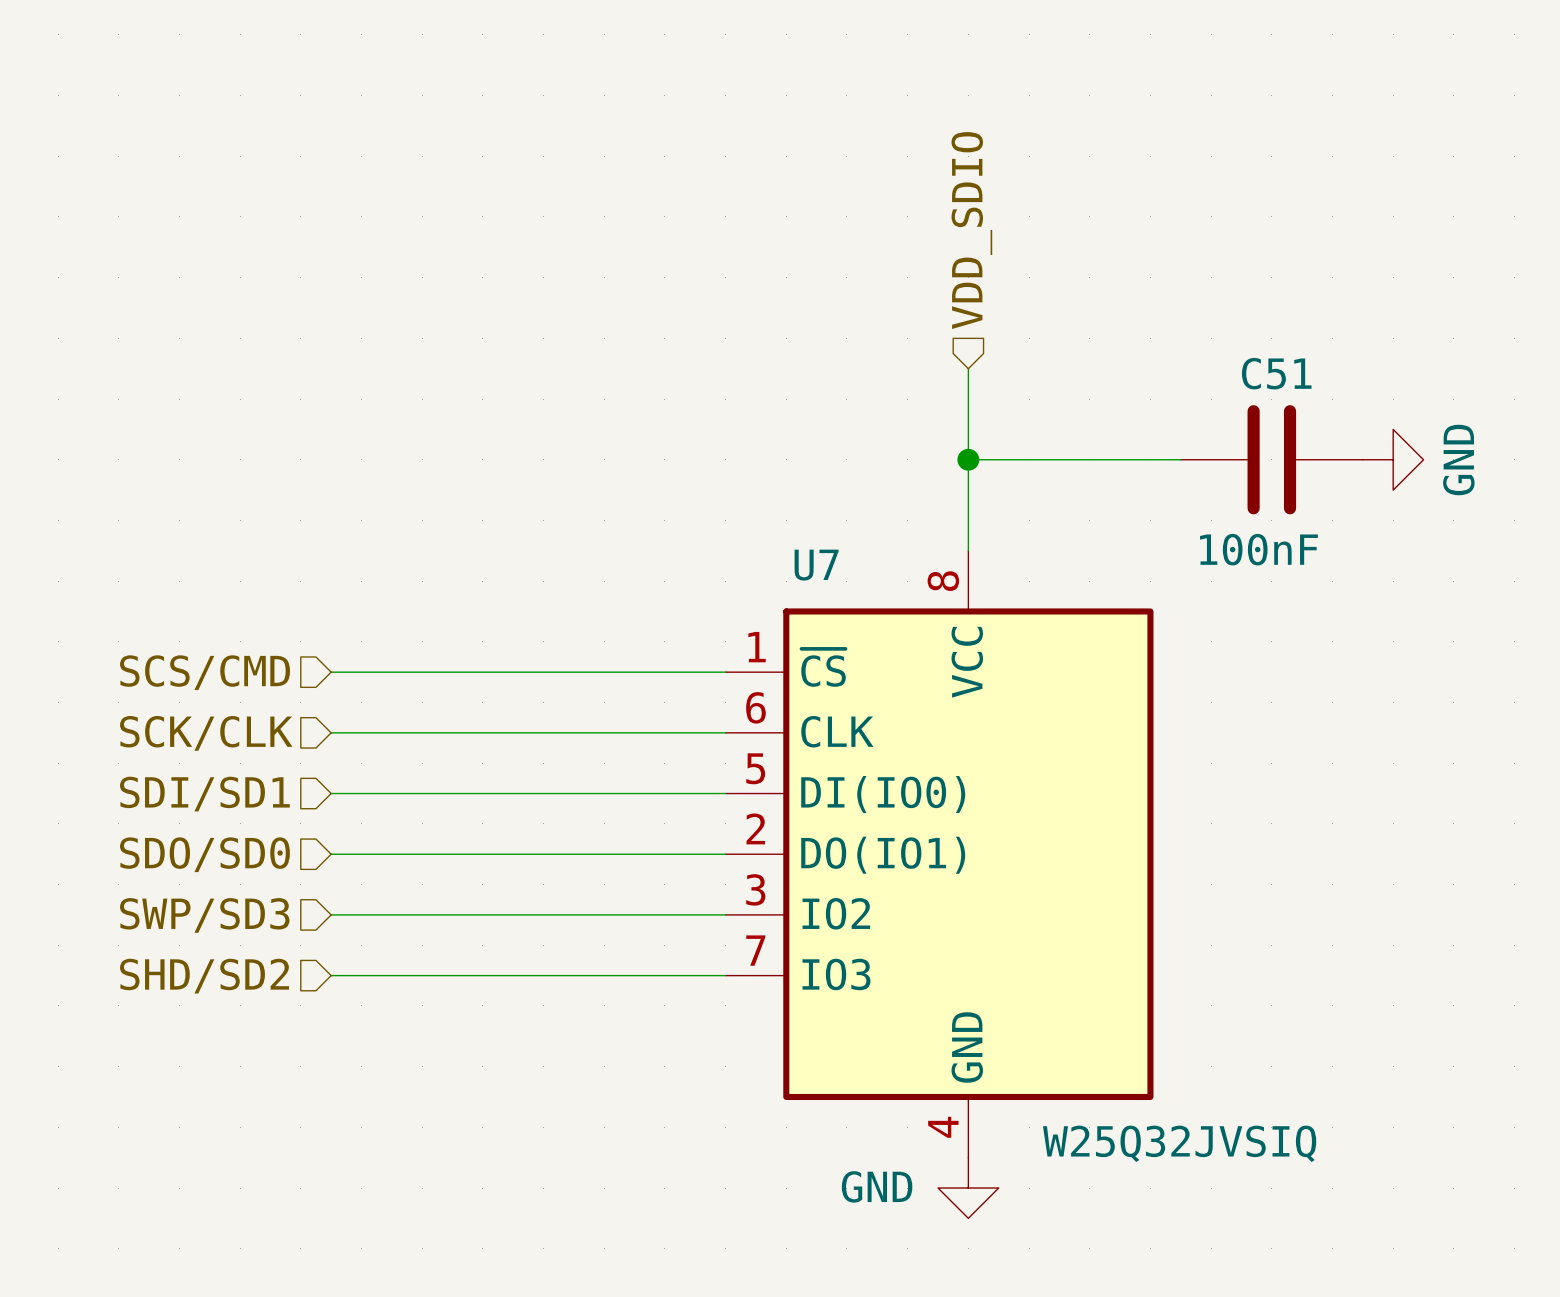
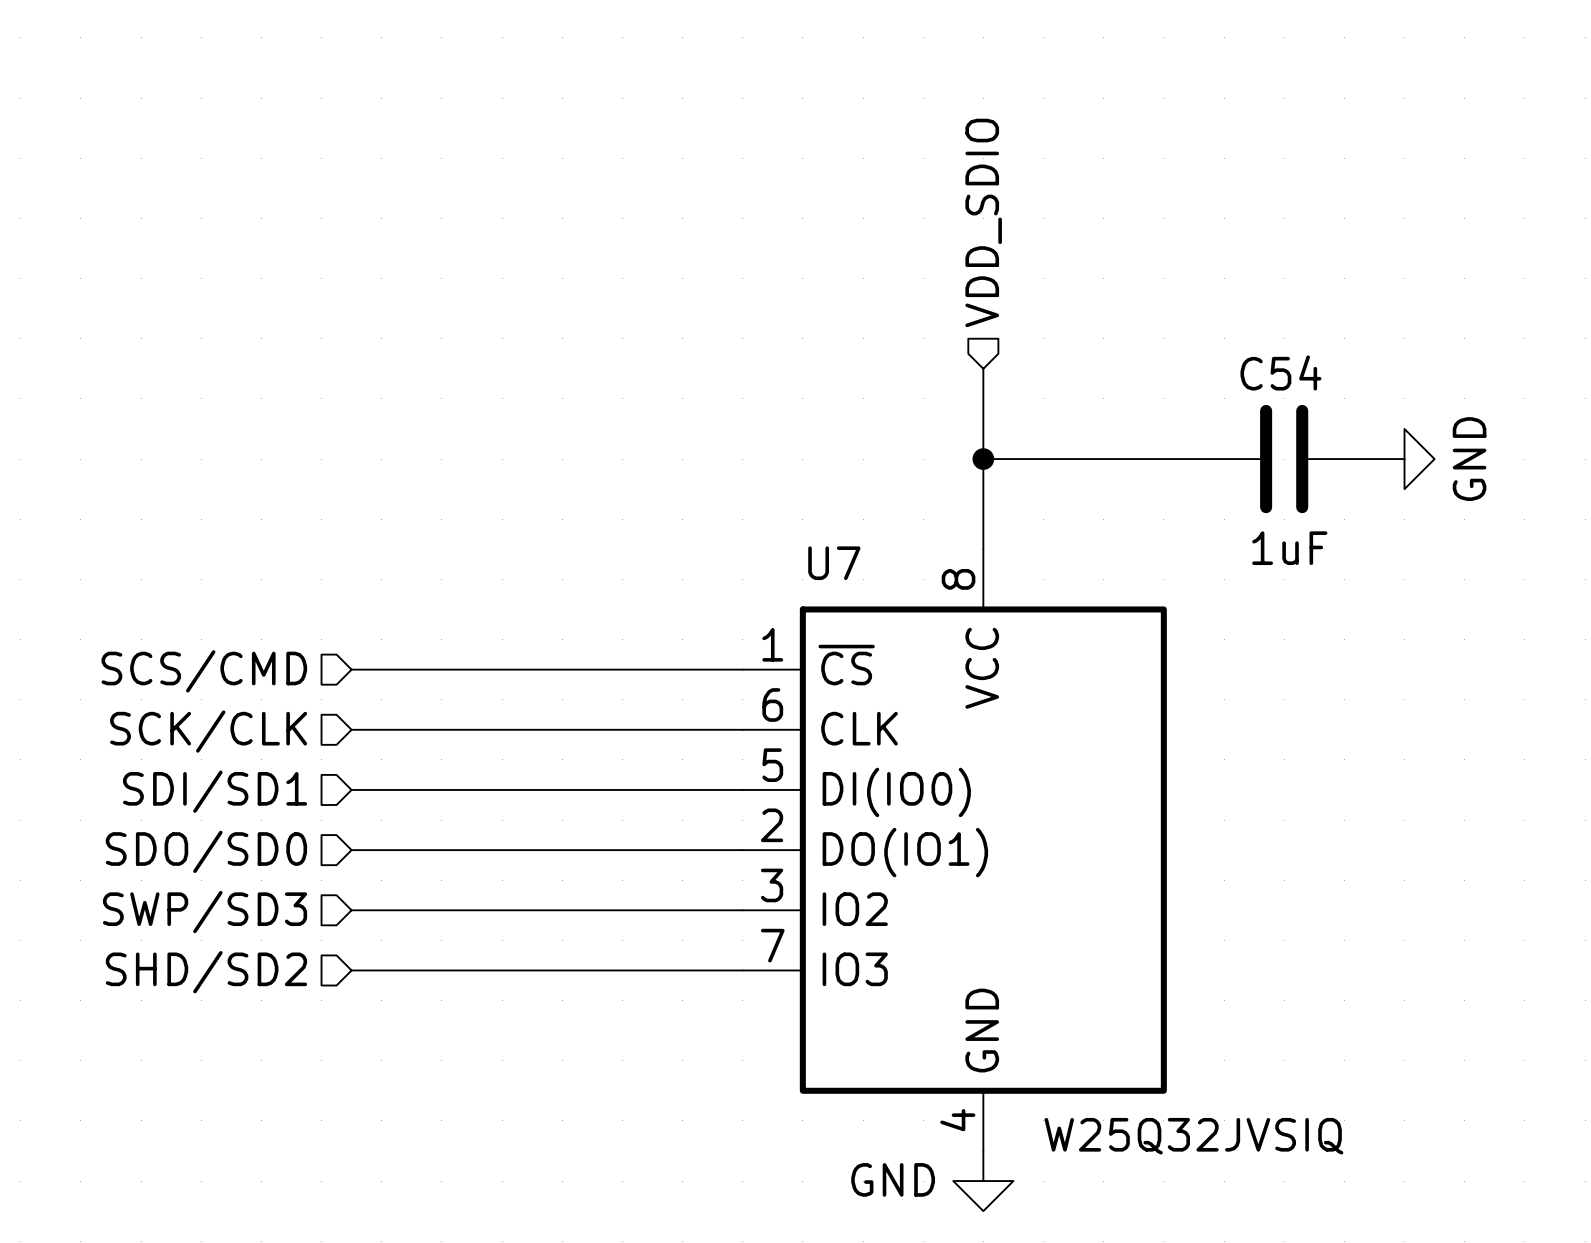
C51 name: C51 (1276, 373) -> C54 (1280, 372)
C51 value: 100nF (1258, 549) -> 1uF (1289, 548)

